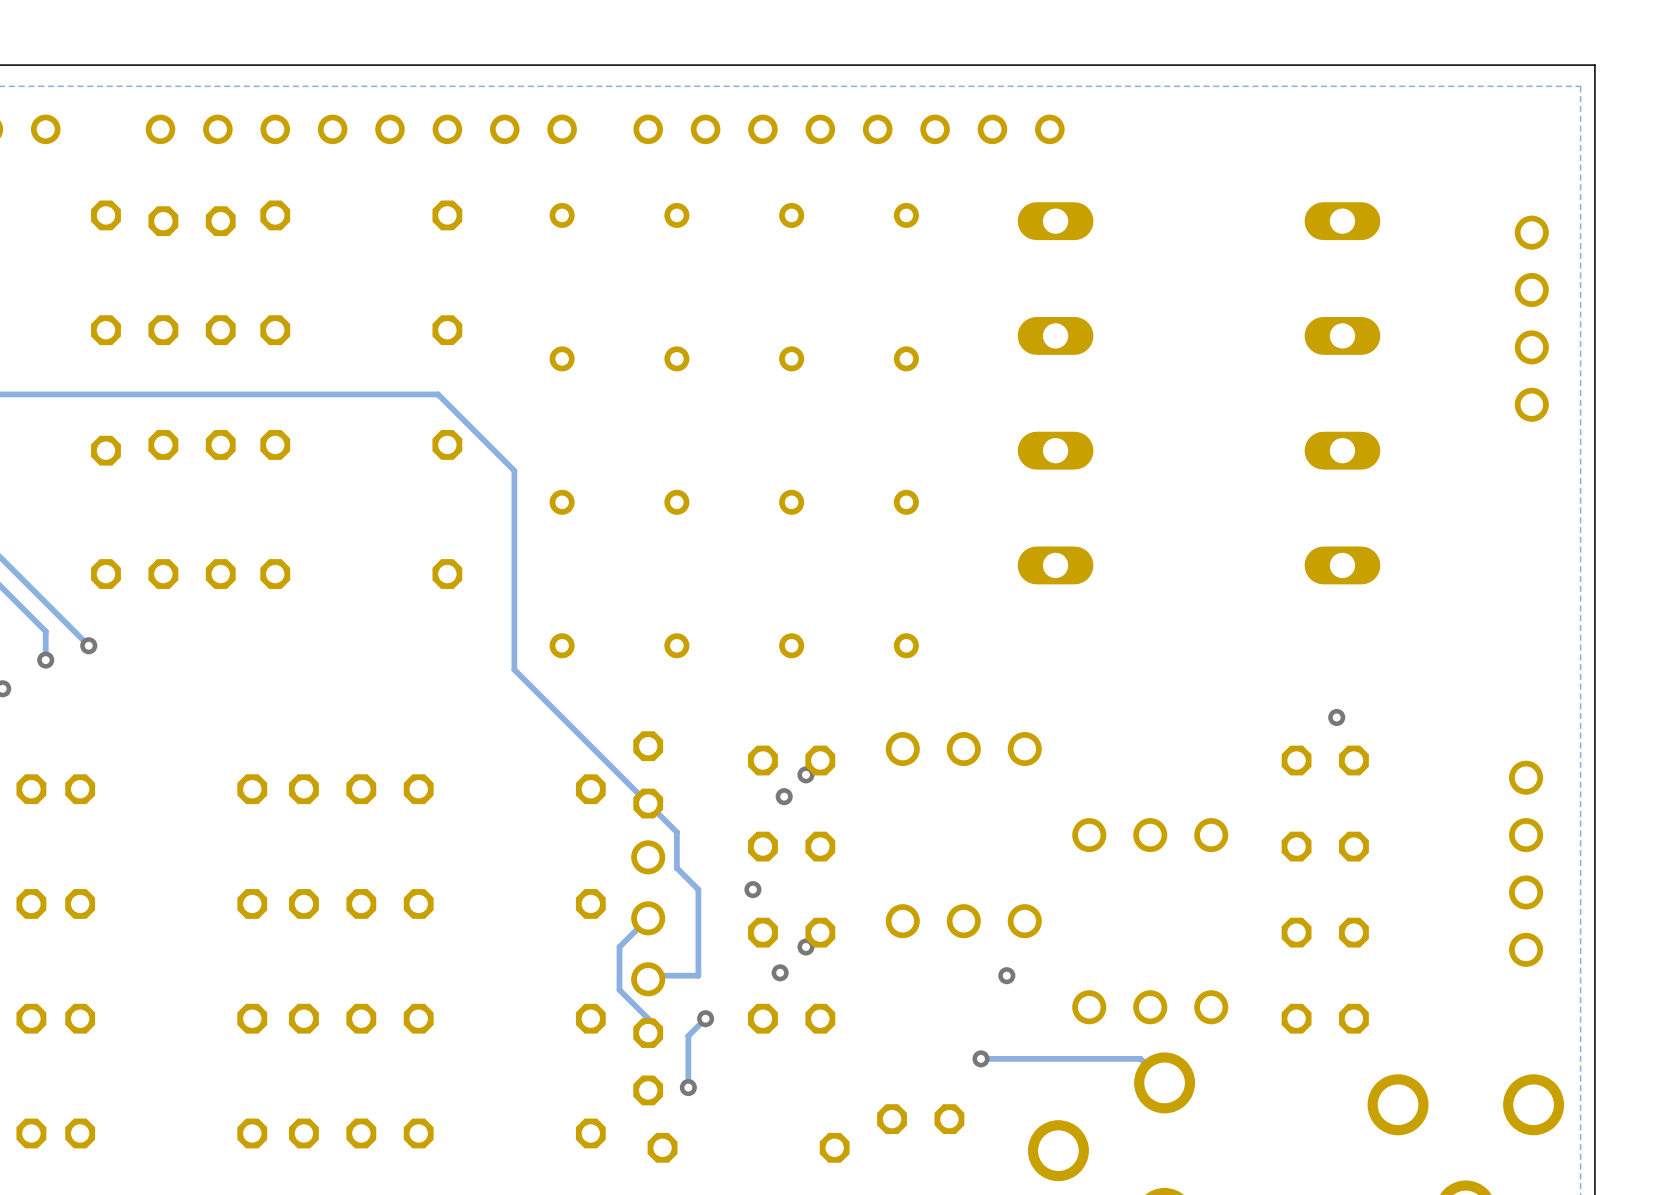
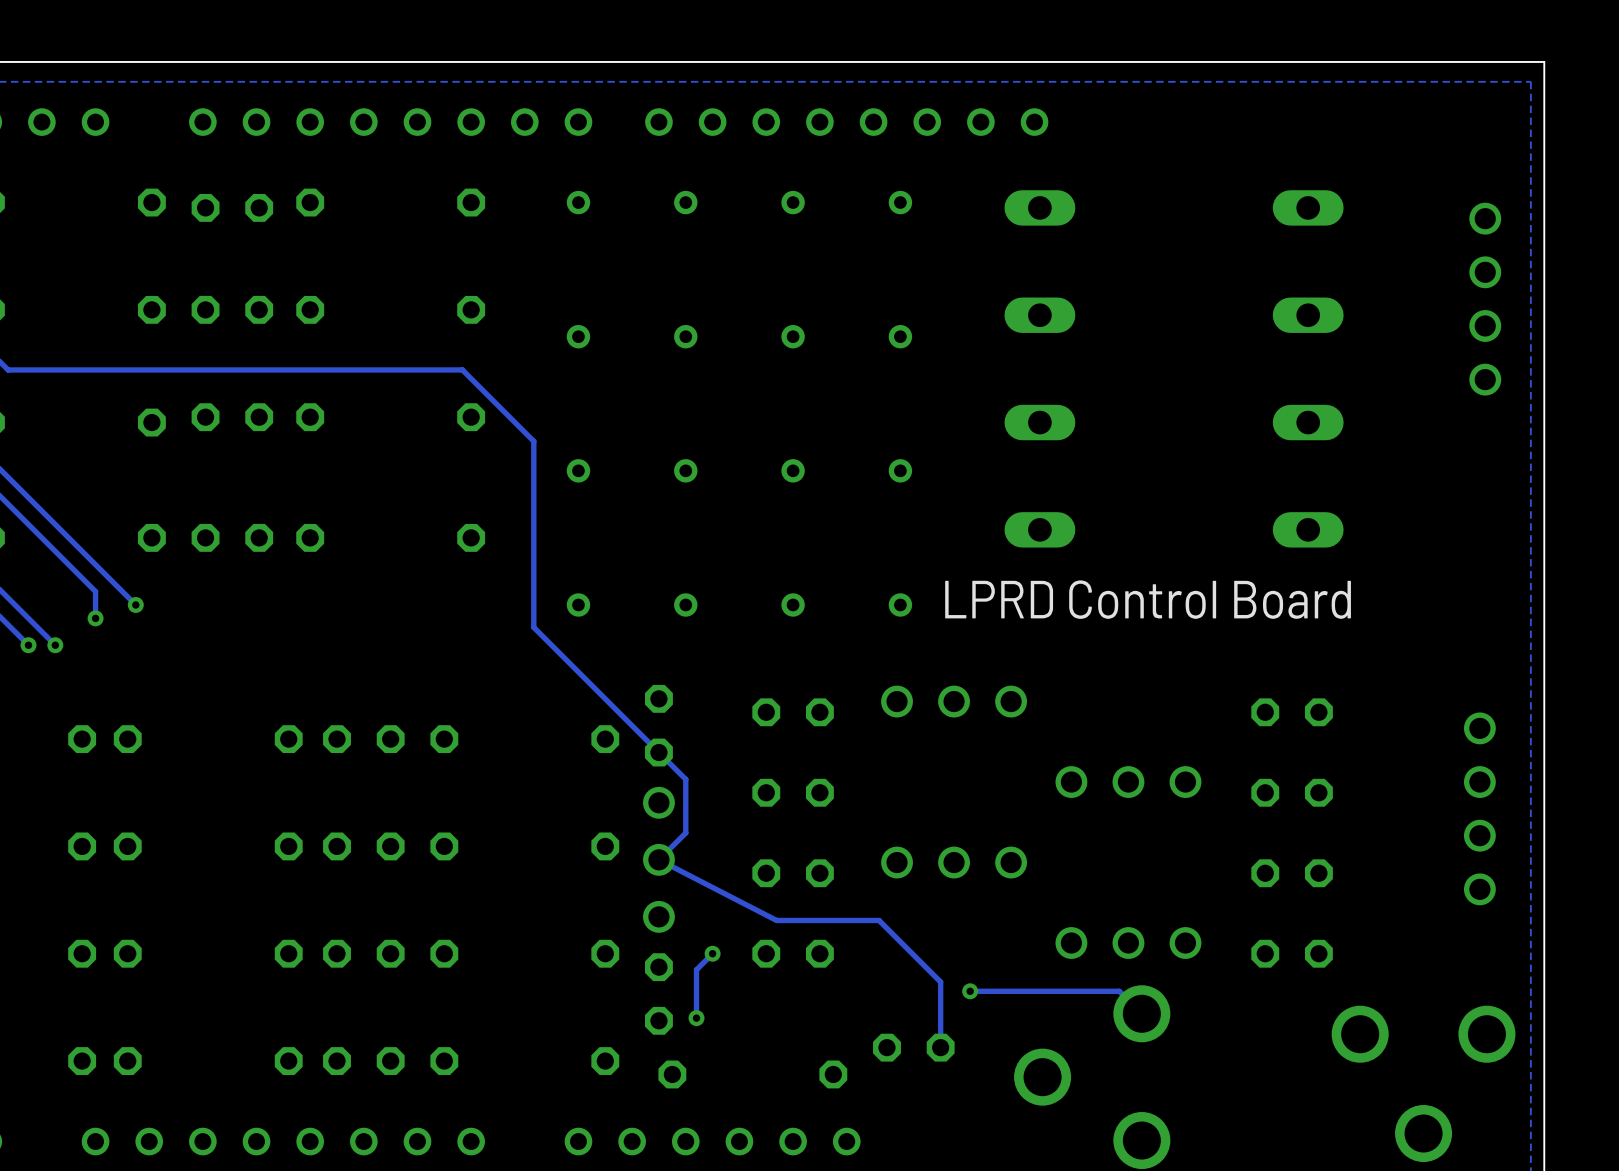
text: none -> LPRD Control Board (1148, 599)
via: (1336, 717) -> none
via: (805, 774) -> none
via: (784, 796) -> none
track: (676, 868) (698, 889) (698, 975) (648, 975) (648, 979) -> (685, 812) (685, 833) (658, 859) (776, 920) (879, 920) (940, 982) (940, 1047)
via: (752, 889) -> none
track: (648, 918) (619, 946) (619, 990) (648, 1018) (648, 1033) -> none
via: (805, 946) -> none
via: (780, 972) -> none
via: (1006, 975) -> none

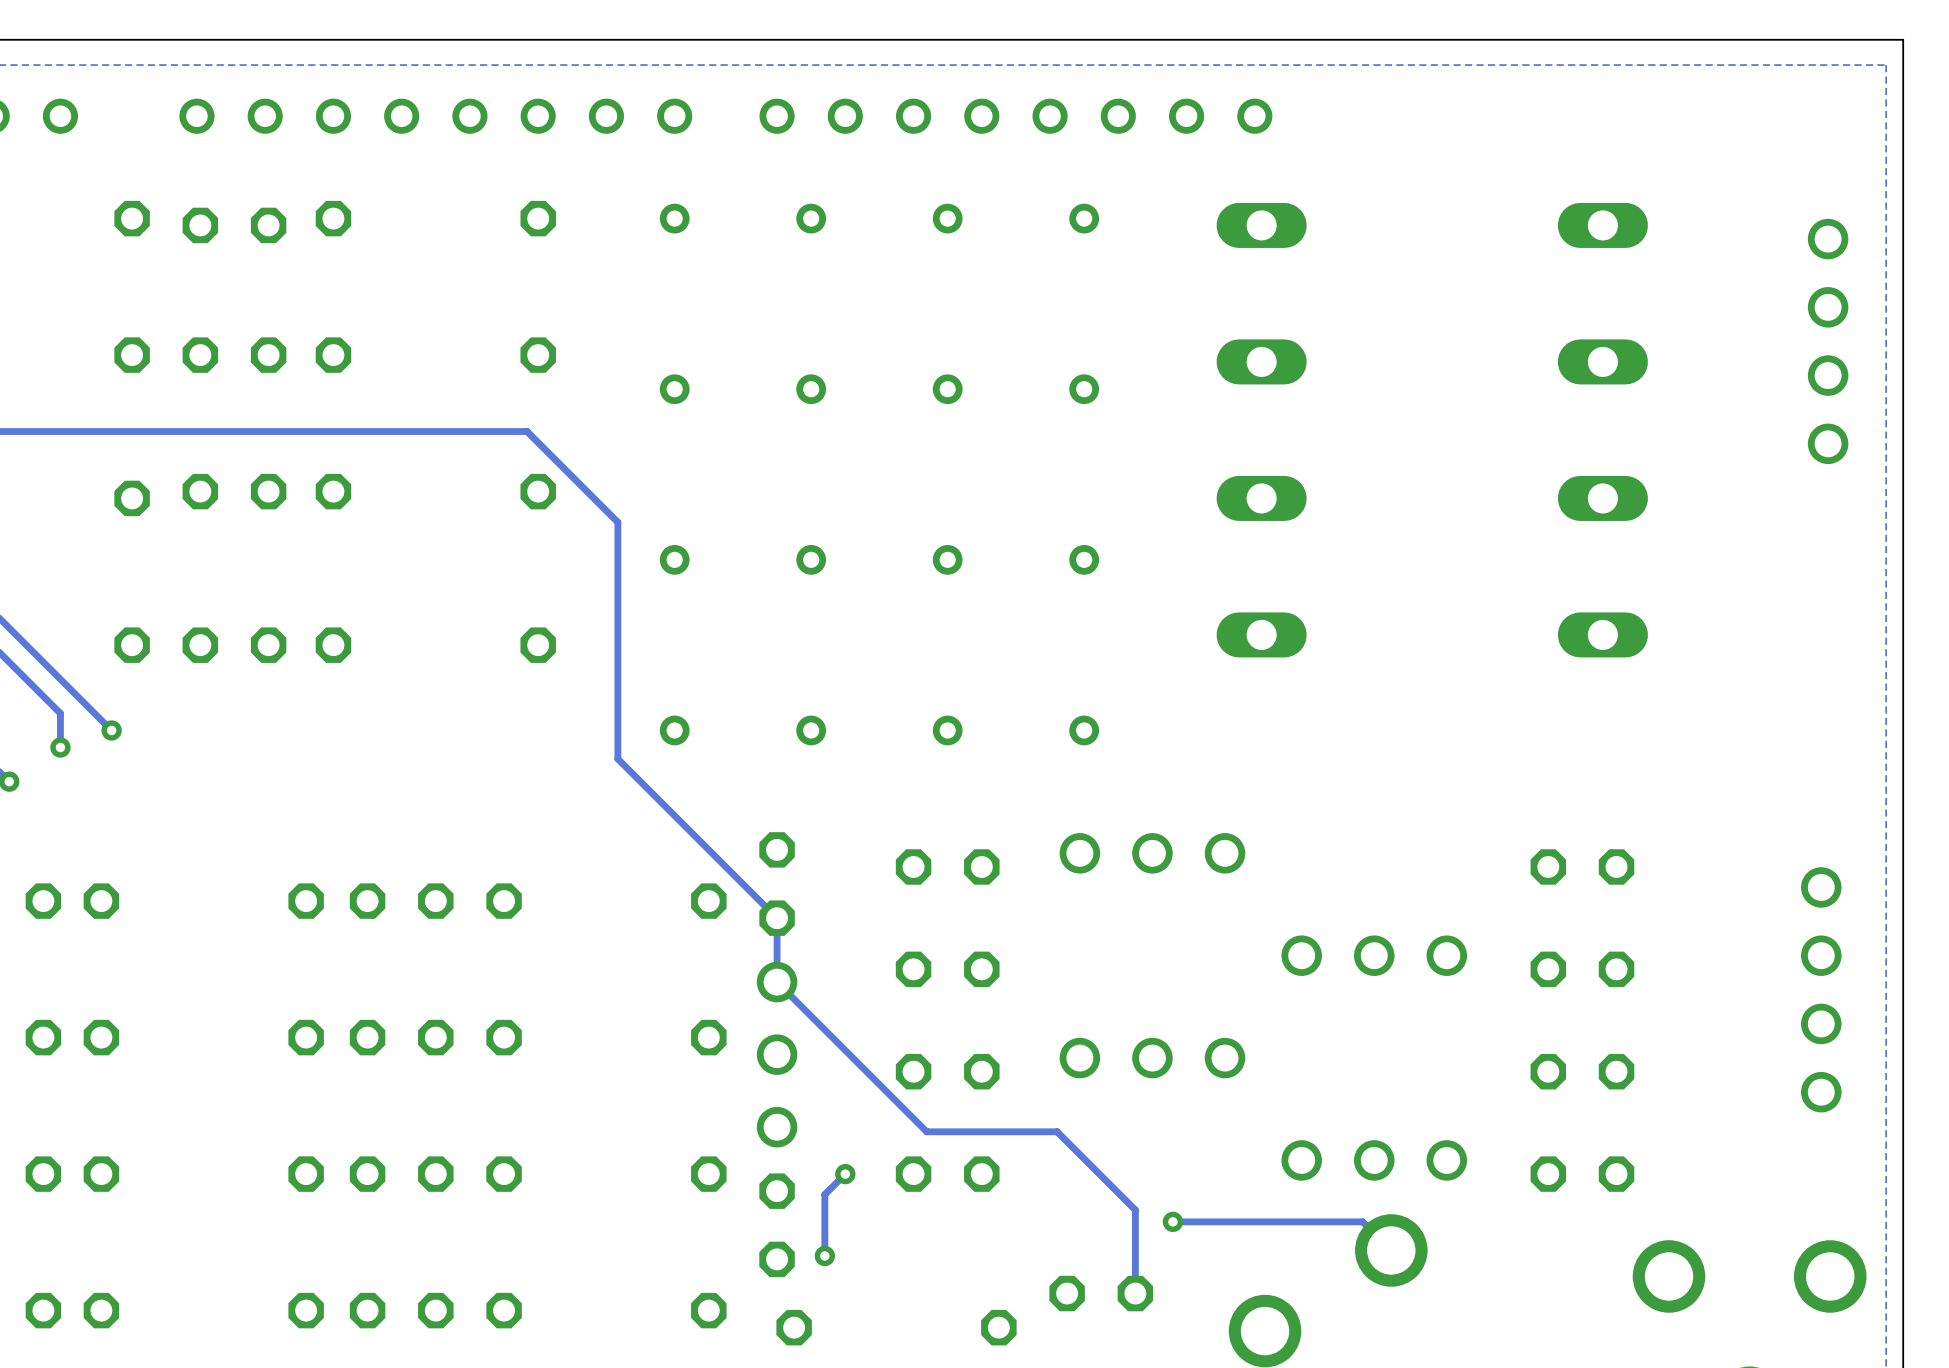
text: LPRD Control Board (1148, 599) -> none
track: (658, 752) (685, 779) (685, 833) (658, 859) (776, 920) -> (777, 918) (777, 982) (926, 1131)

